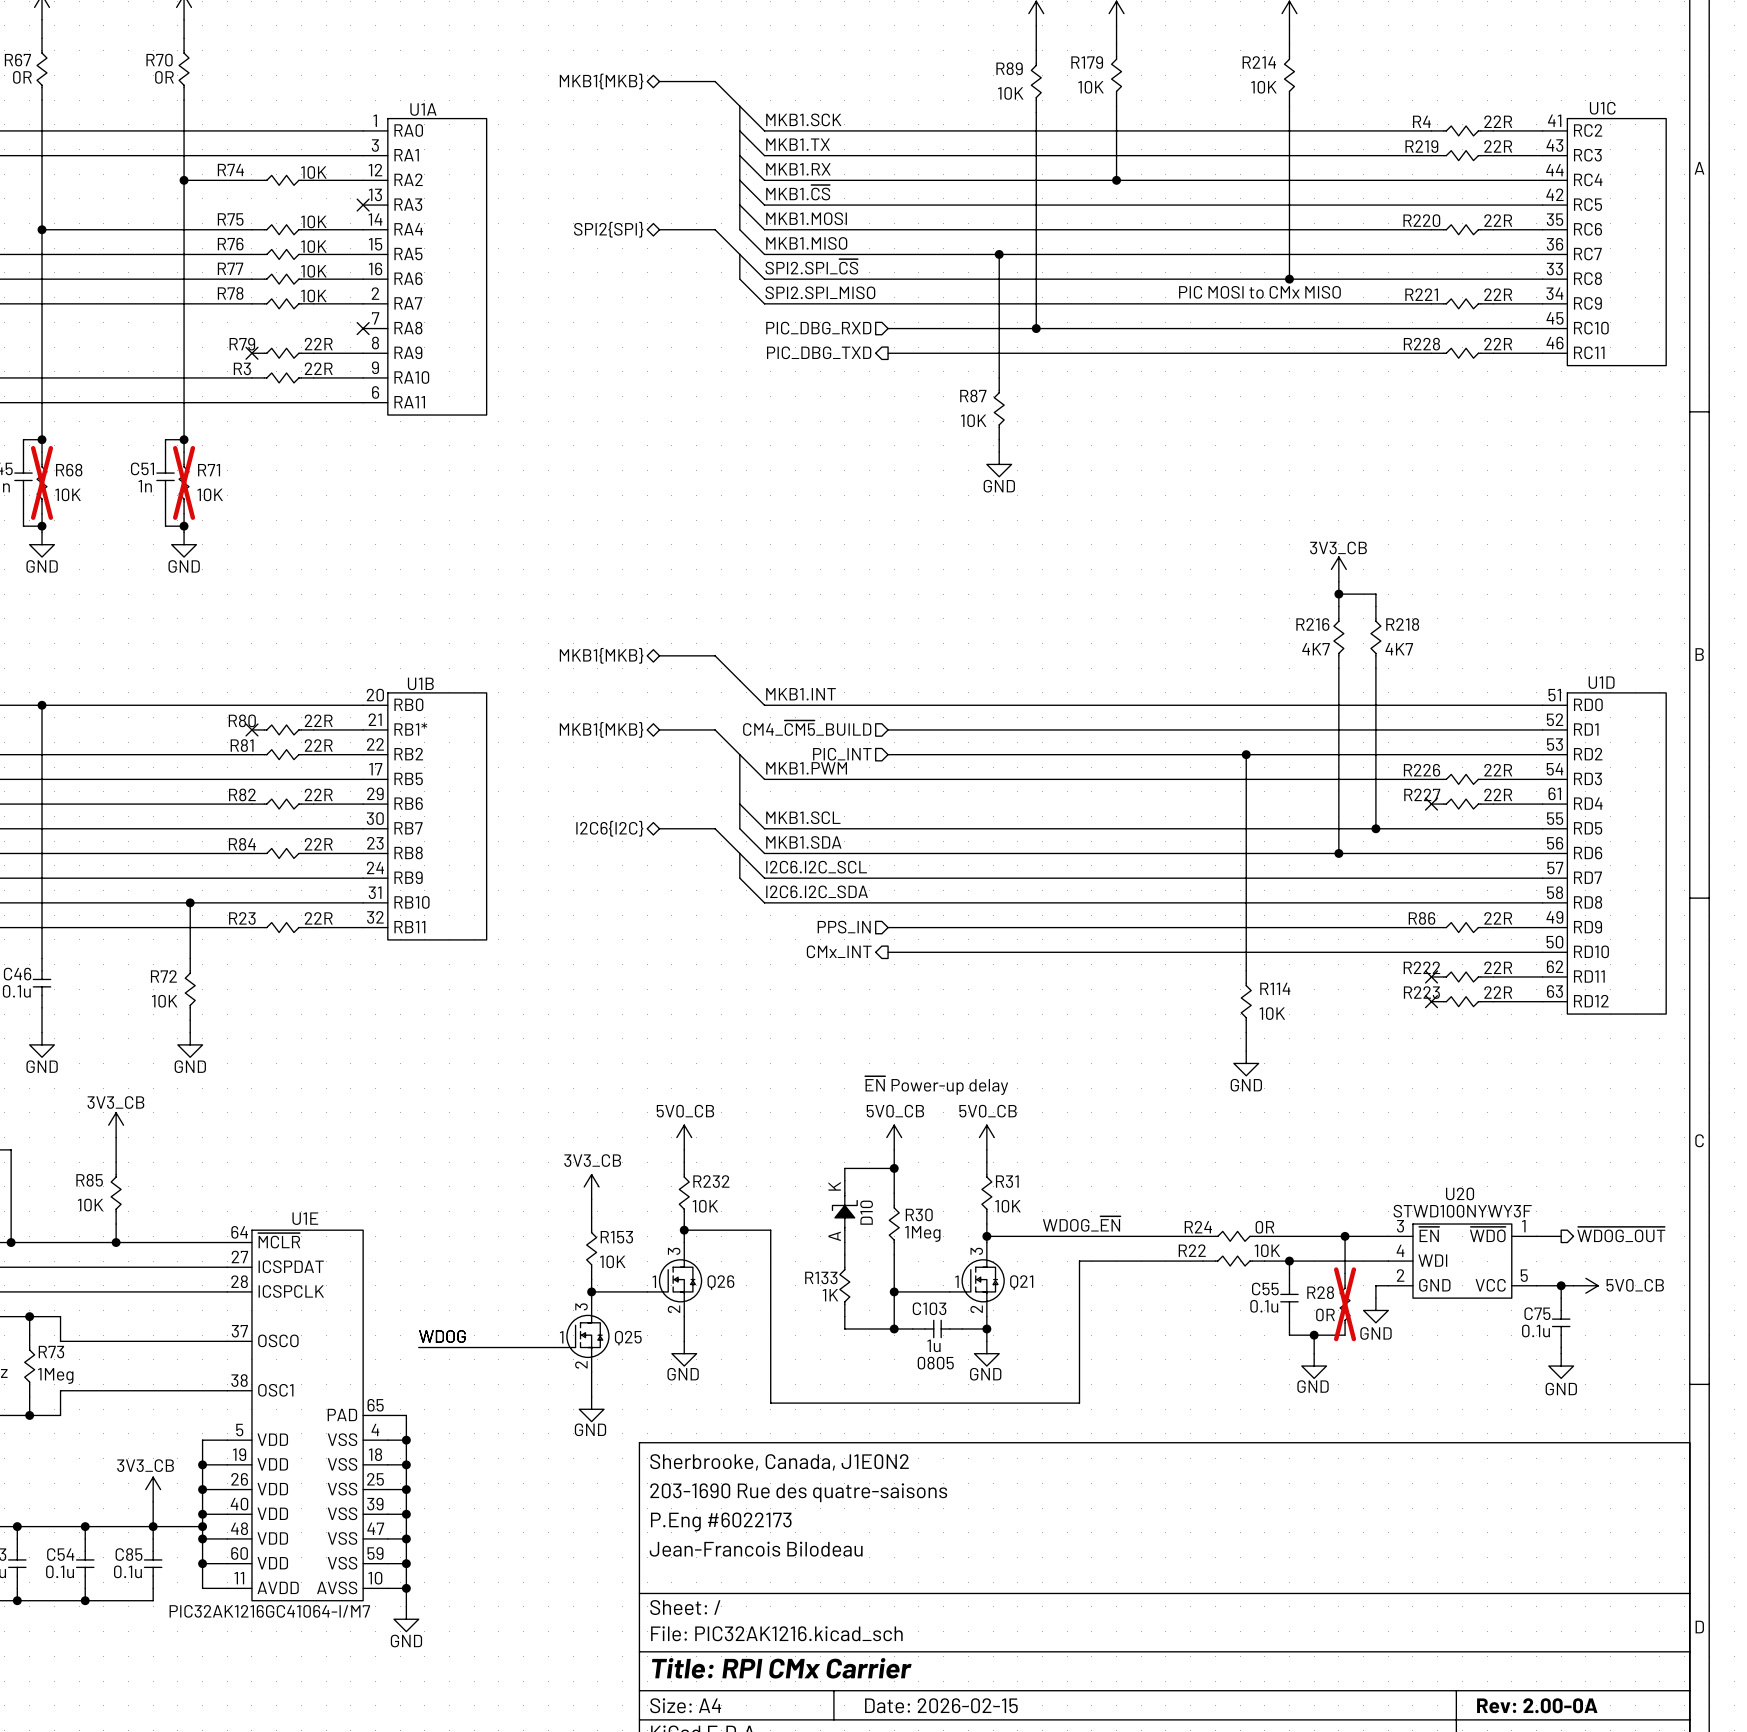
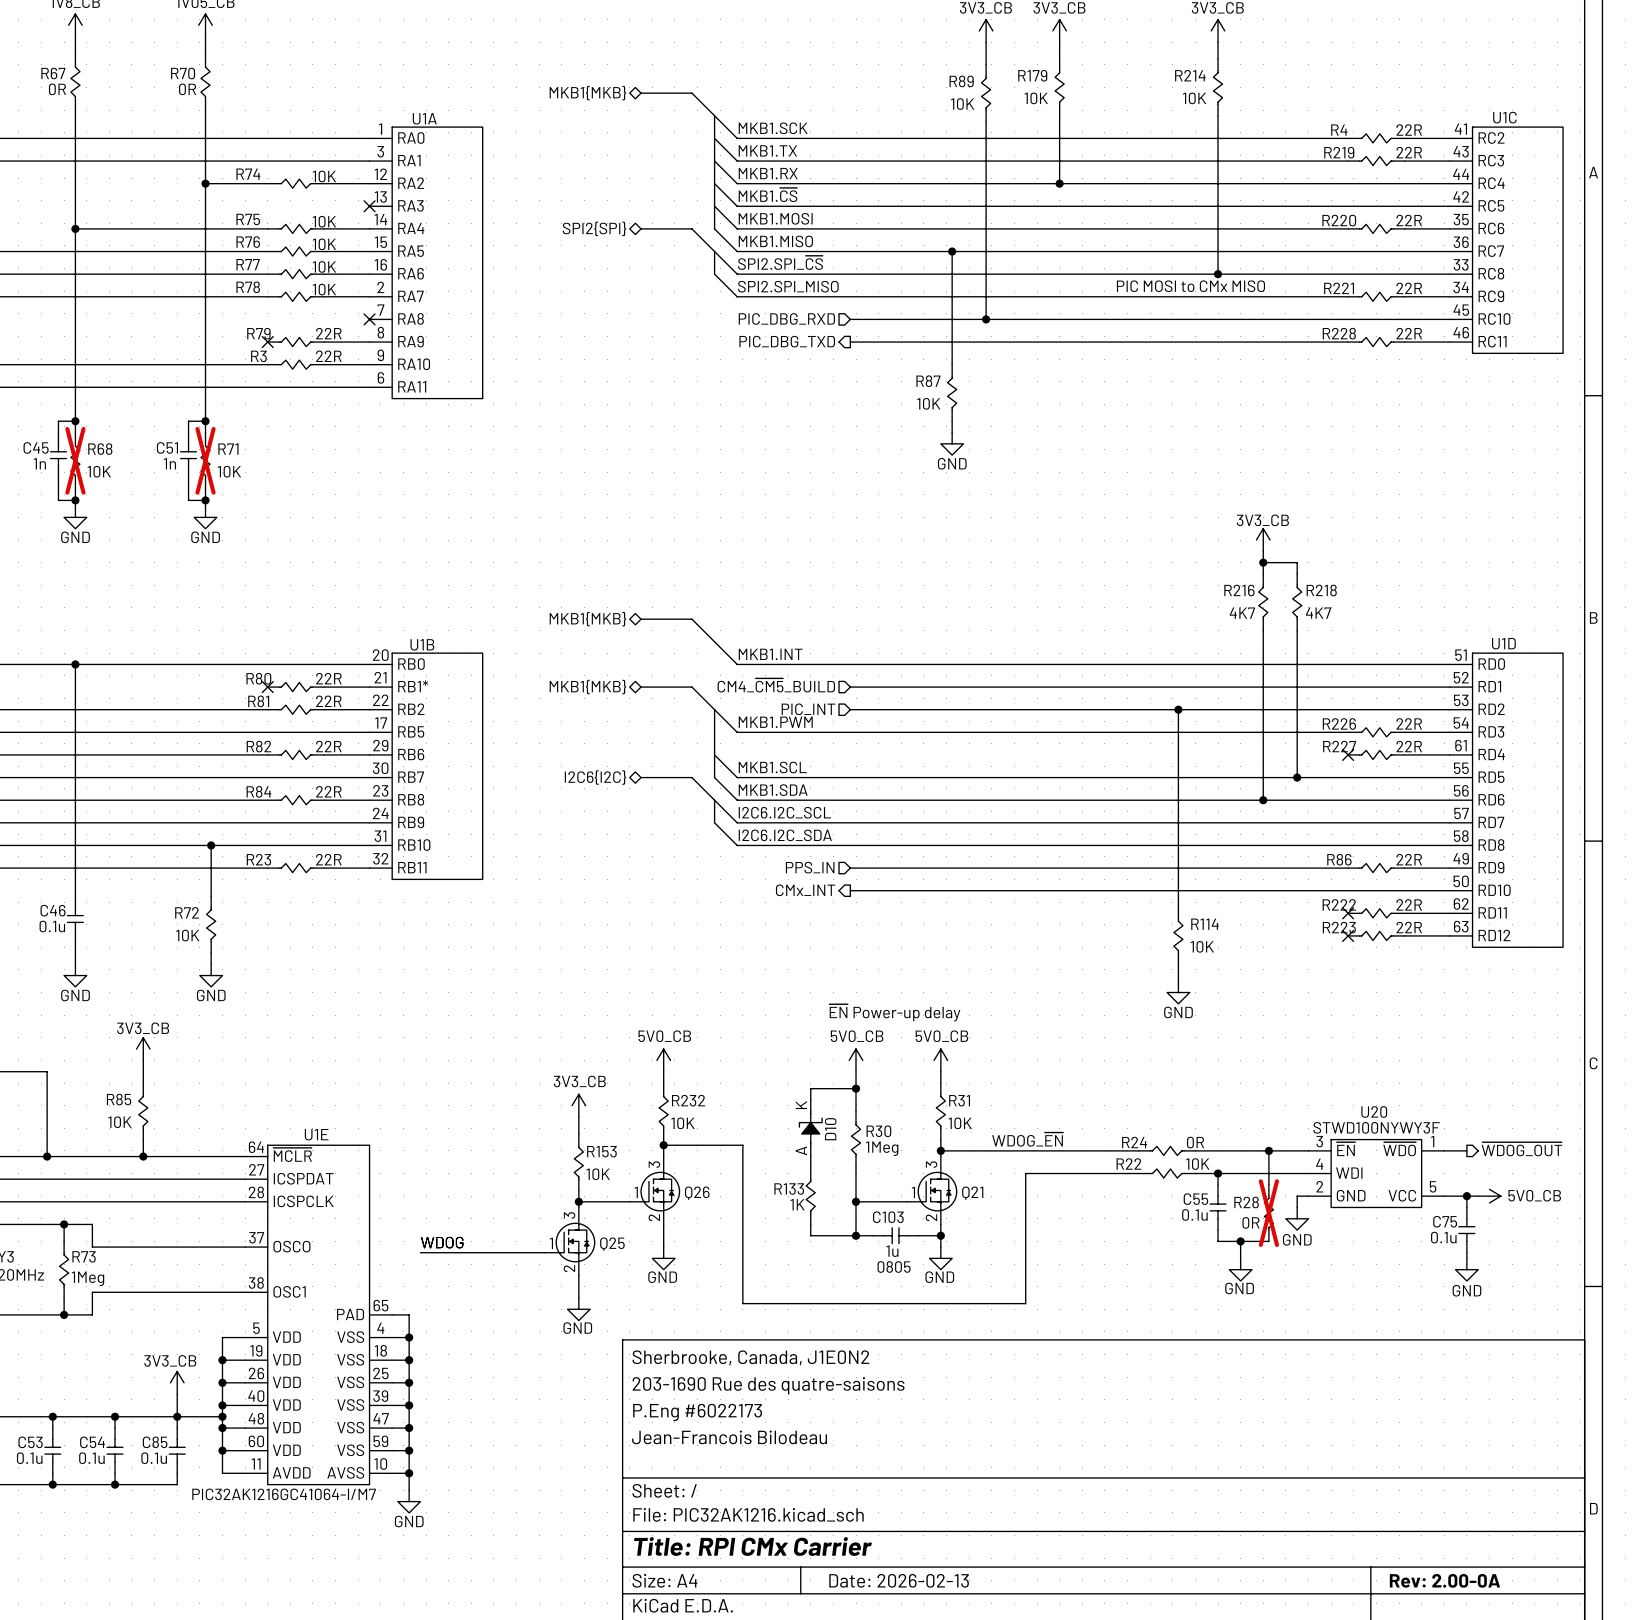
title block: Date: 2026-02-15 (941, 1705) -> Date: 2026-02-13 (899, 1580)

